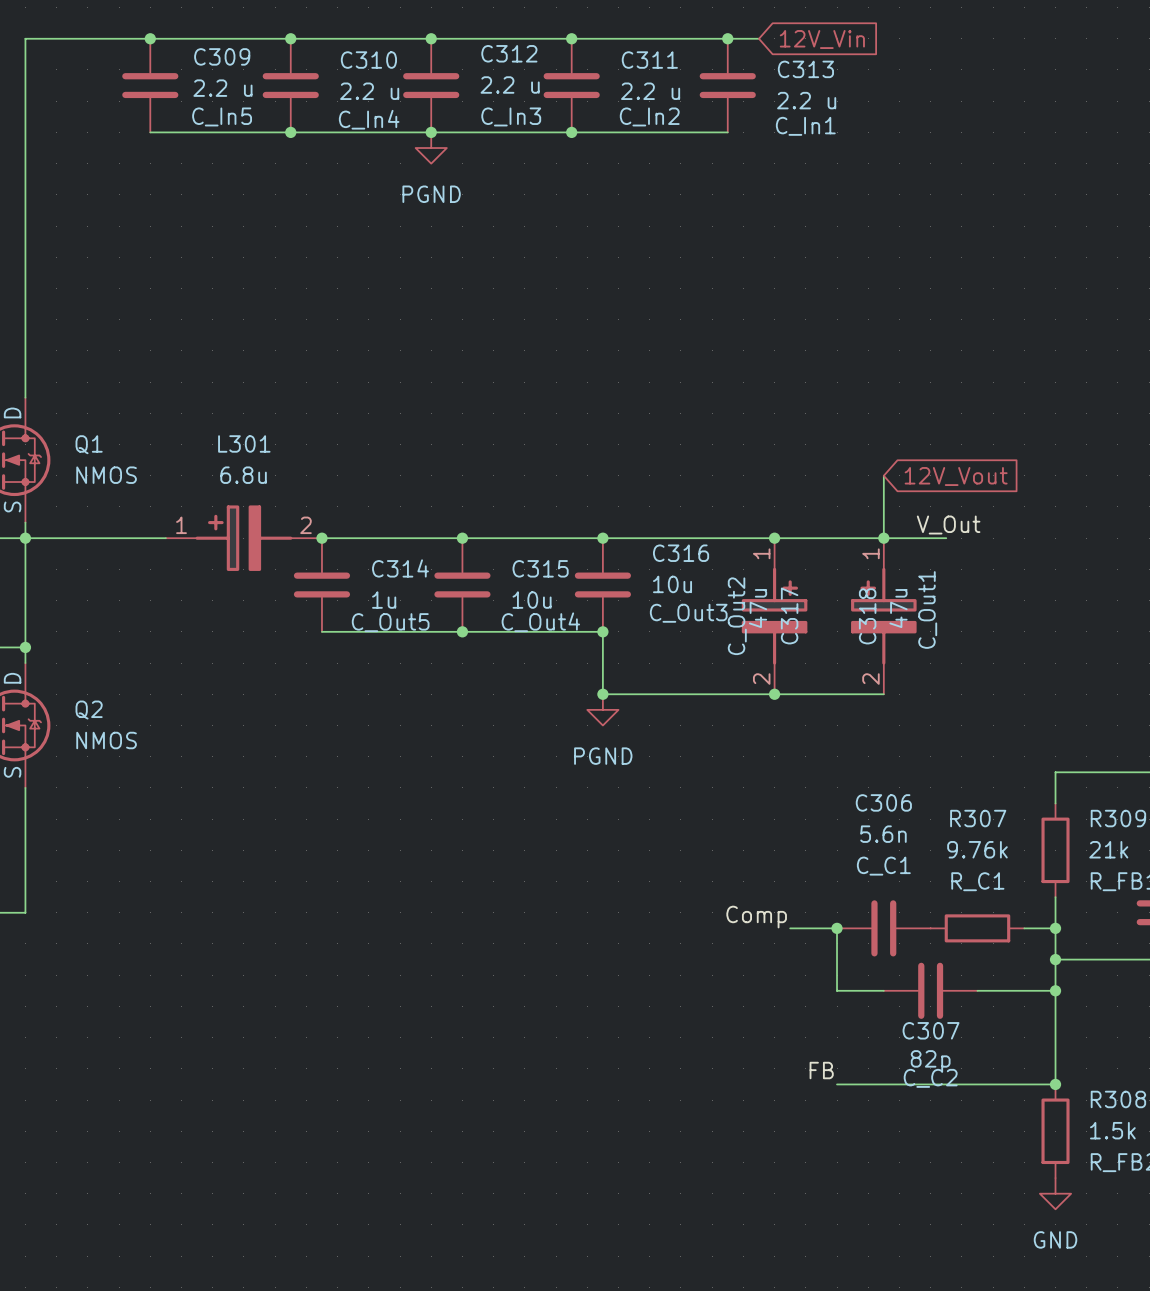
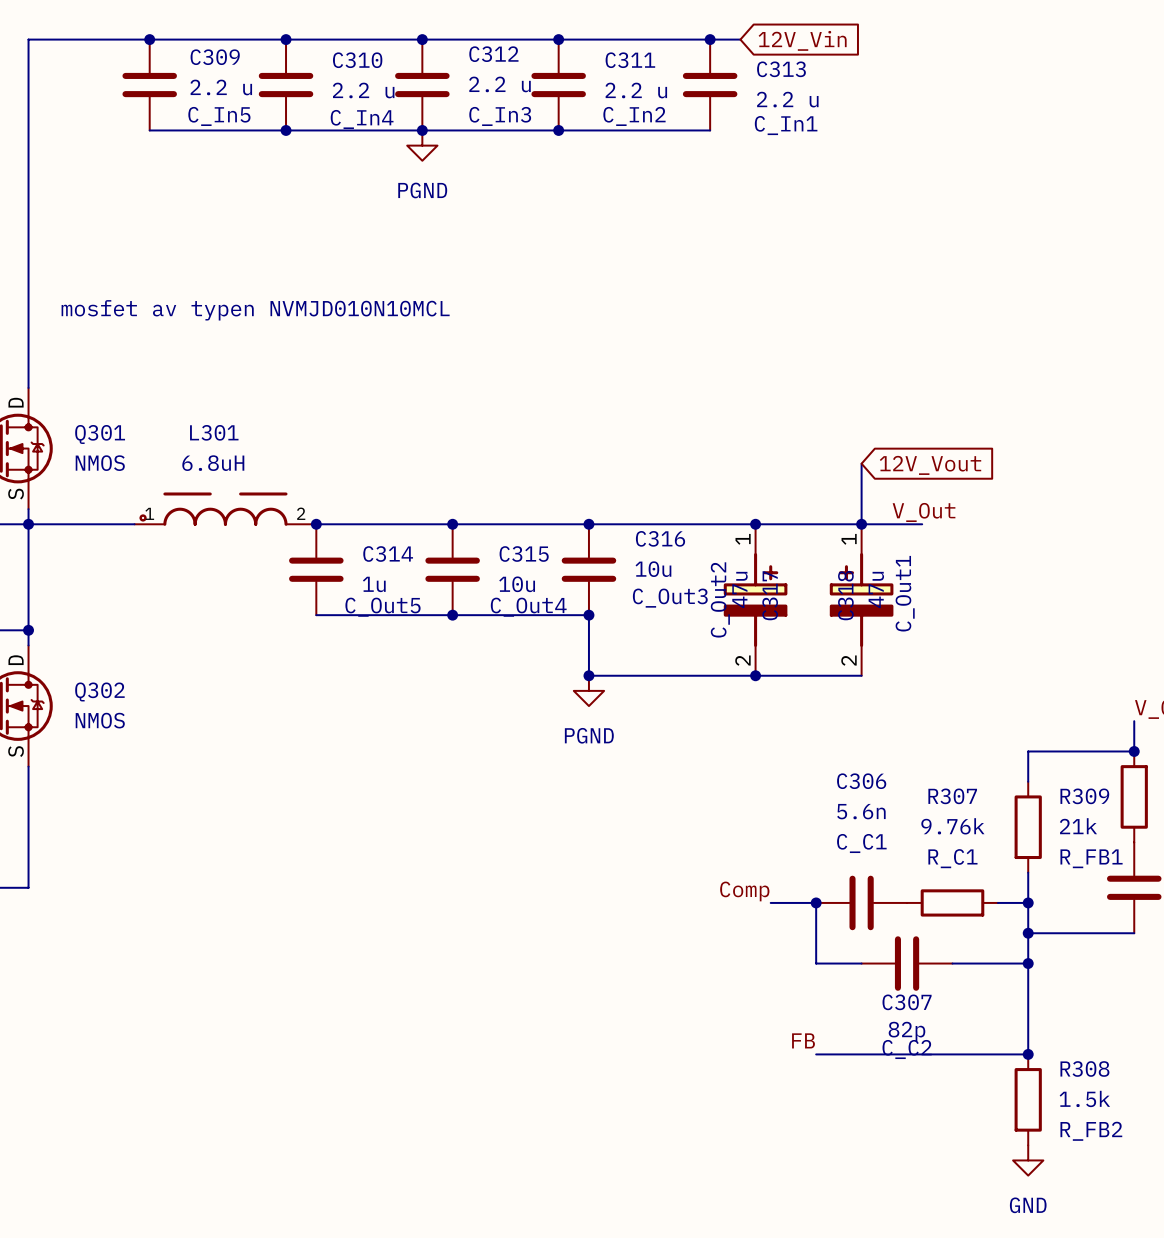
text: none -> mosfet av typen NVMJD010N10MCL (255, 310)
Q1 name: Q1 (89, 444) -> Q301 (100, 434)
L301 value: 6.8u (243, 475) -> 6.8uH (213, 463)
L301 symbol: [165, 505, 322, 571] -> [134, 492, 317, 526]
Q2 name: Q2 (89, 710) -> Q302 (99, 691)

